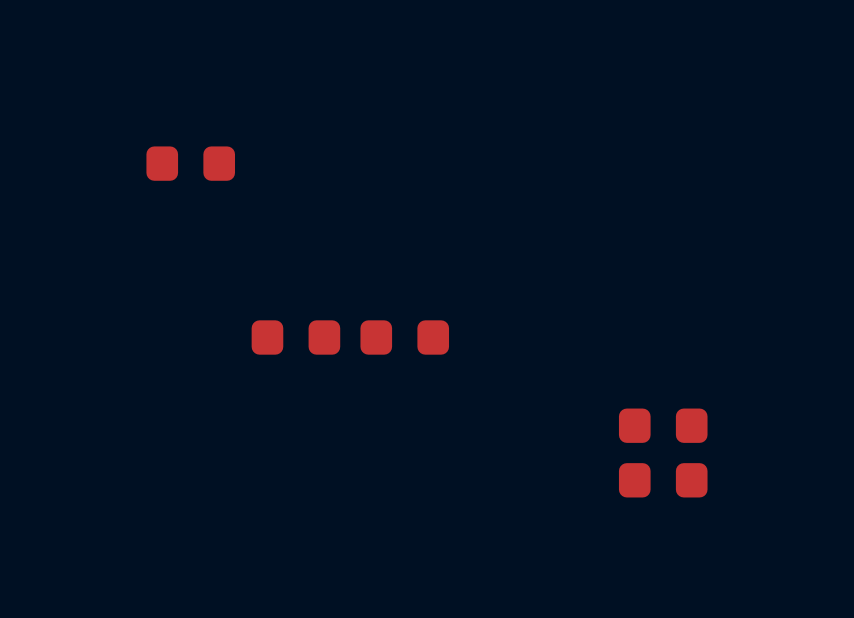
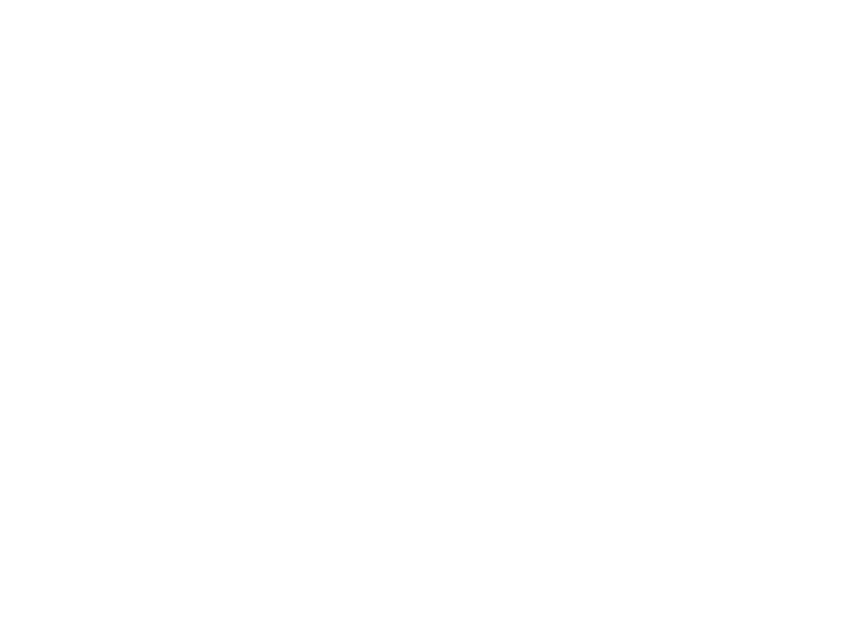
part: (190, 163) -> none
part: (295, 337) -> none
part: (404, 337) -> none
part: (663, 425) -> none
part: (663, 480) -> none

